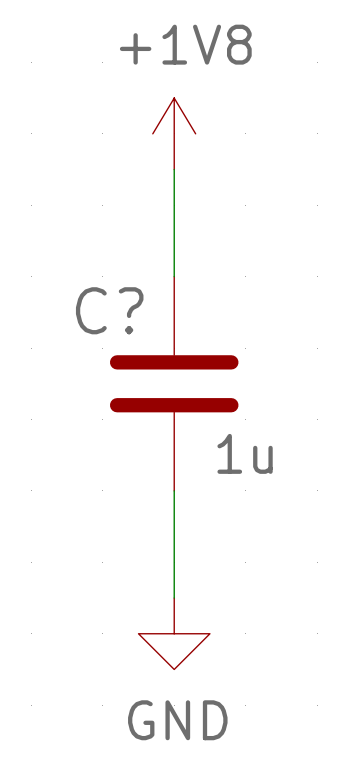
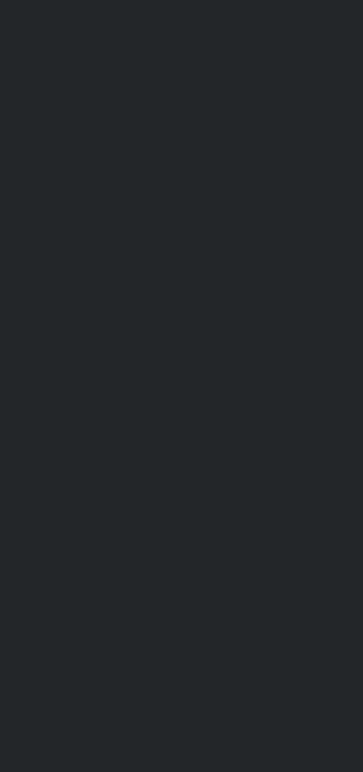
power symbol: +1V8 (174, 133) -> none
wire: (174, 169) (174, 276) -> none
C?: (174, 383) -> none
wire: (174, 490) (174, 598) -> none
power symbol: GND (174, 633) -> none

